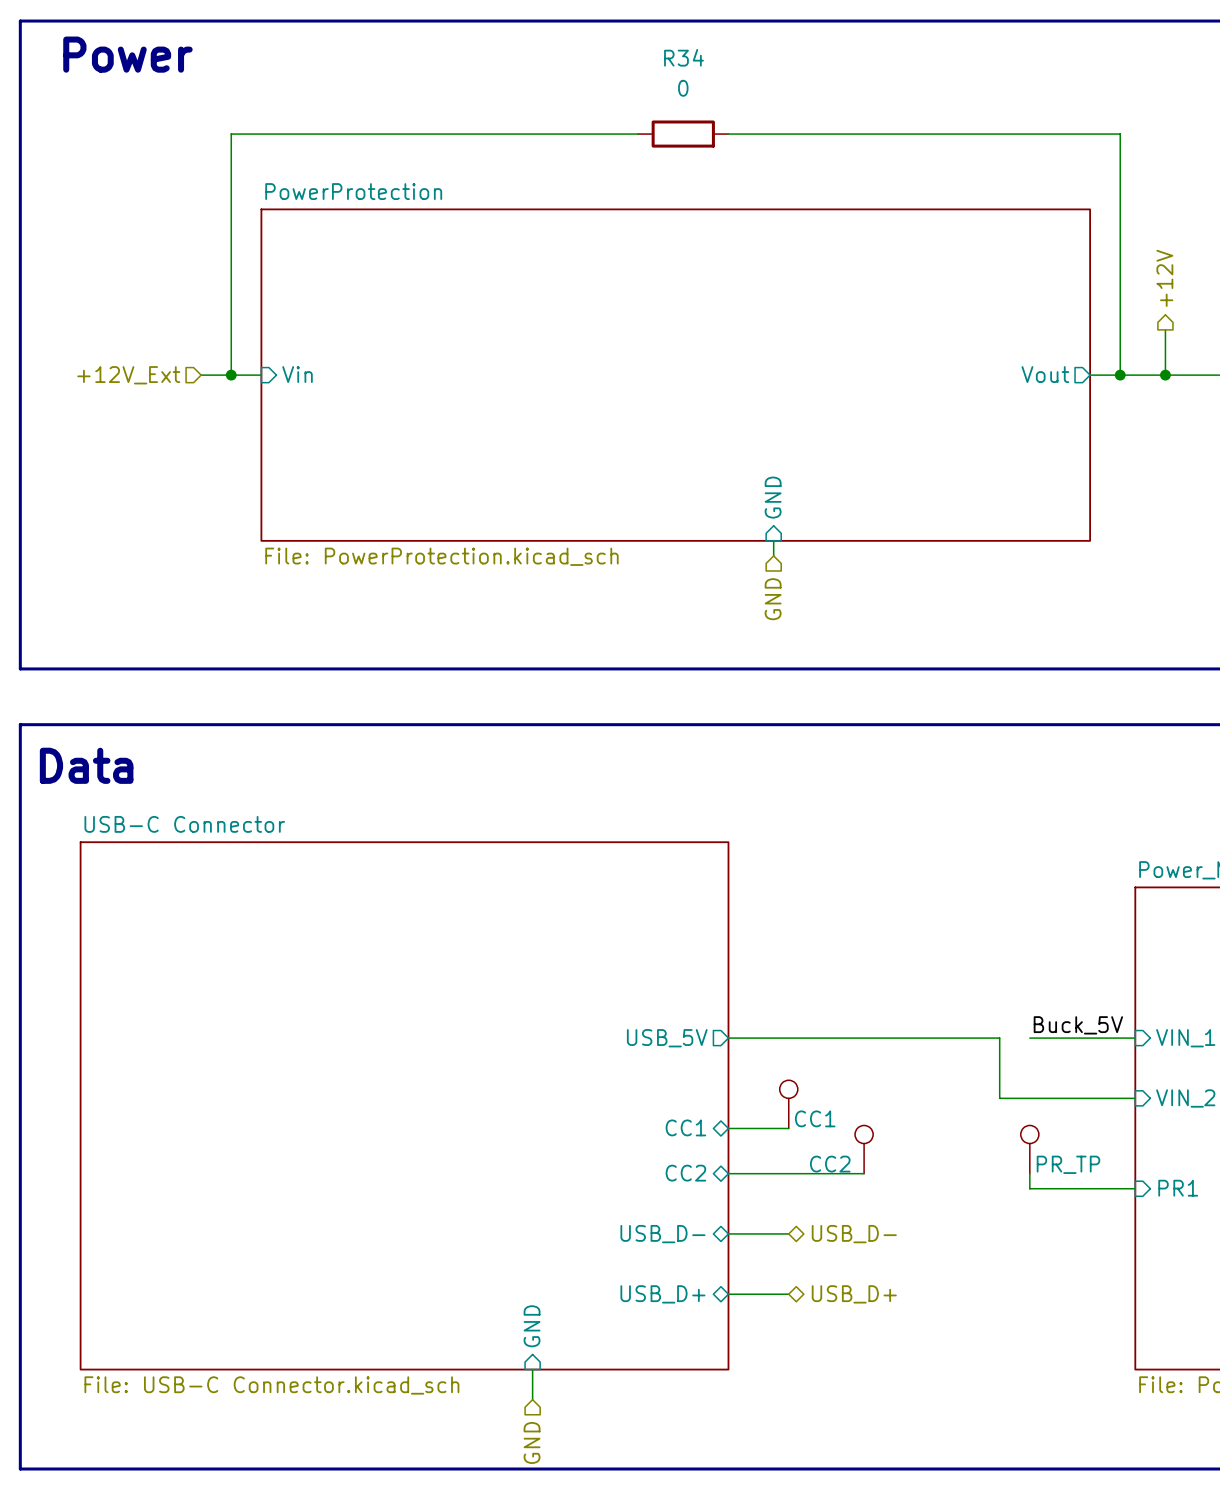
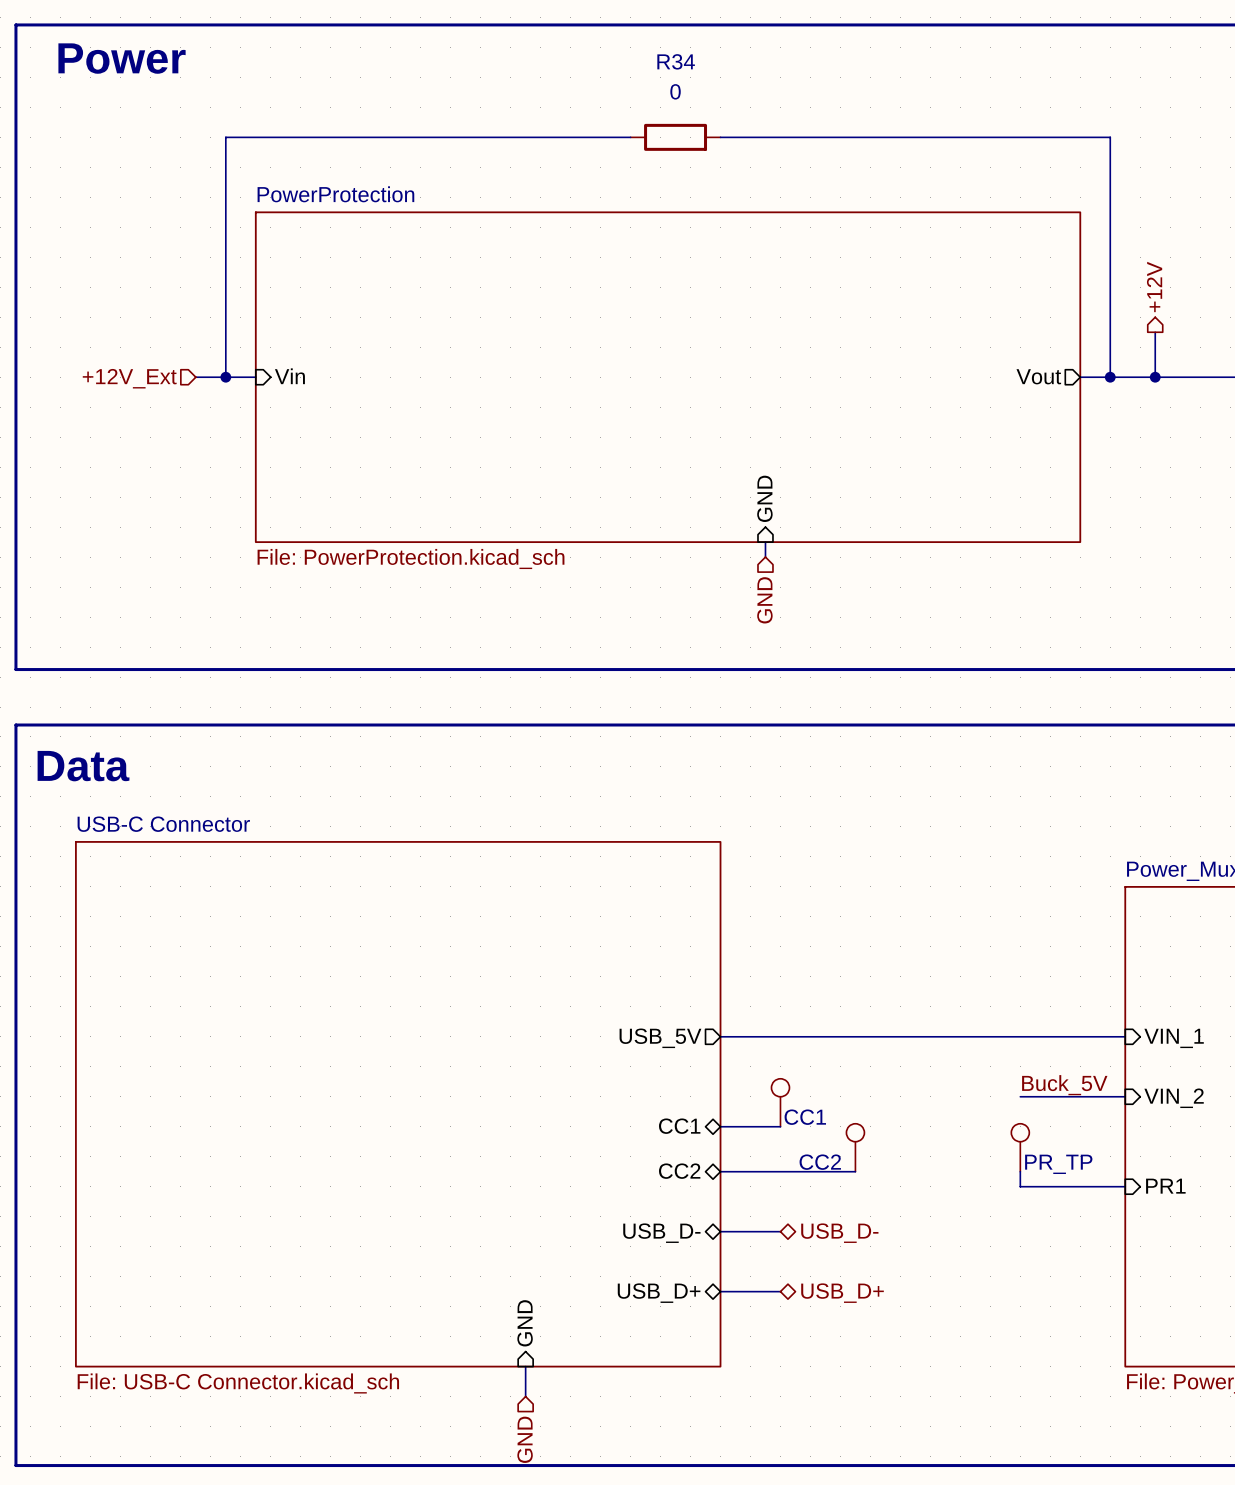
label position: Buck_5V (1078, 1025) -> Buck_5V (1064, 1085)
wire: (999, 1038) (999, 1098) (1029, 1098) -> (990, 1036) (1020, 1036)

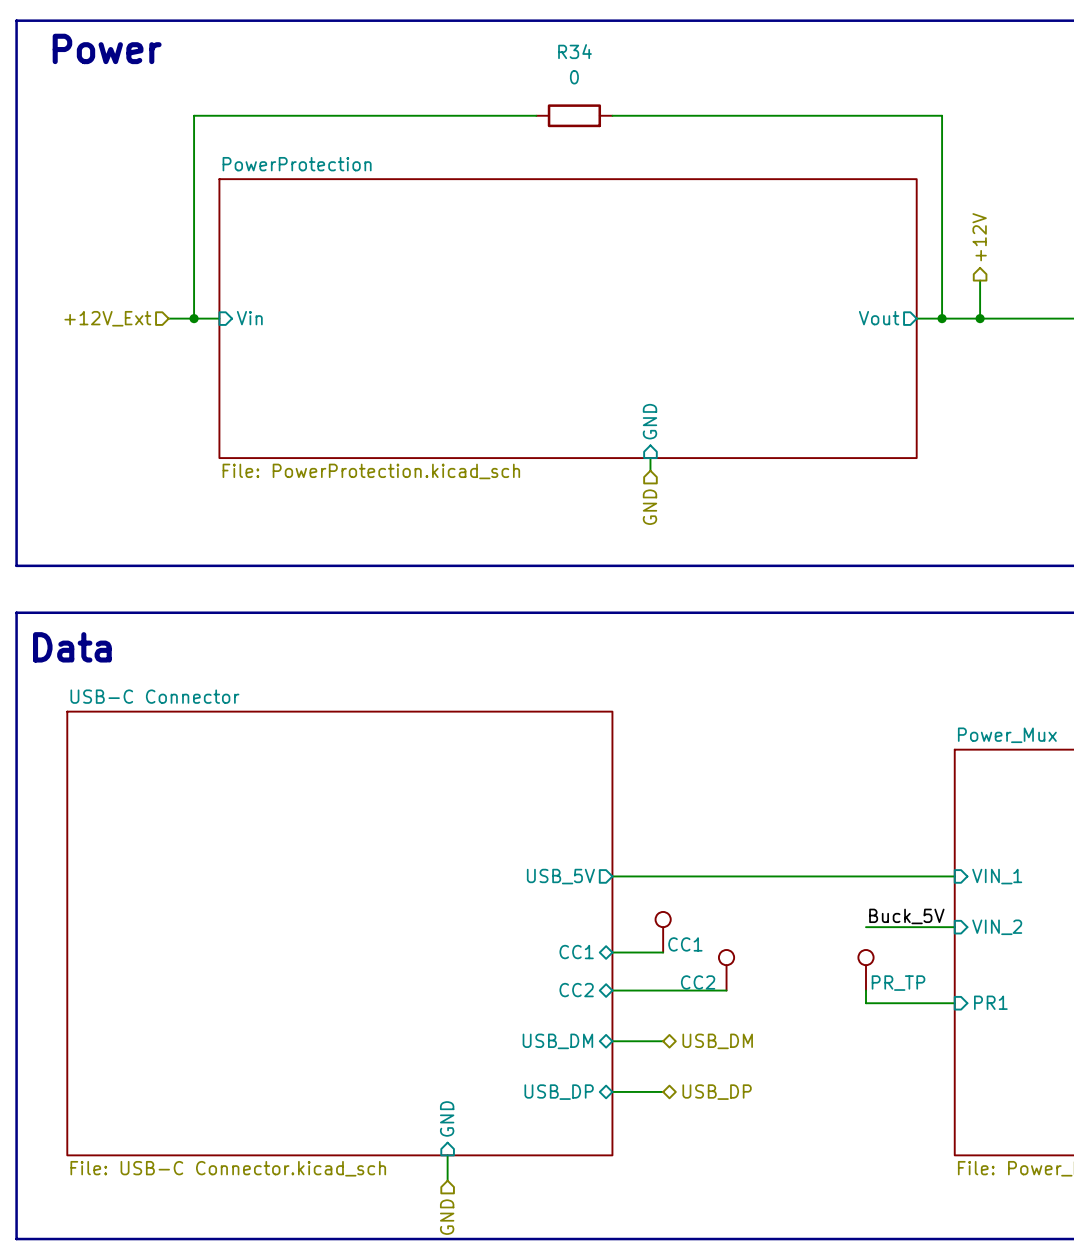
sheet pin: USB_D- (661, 1233) -> USB_DM (557, 1041)
hierarchical label: USB_D- (839, 1233) -> USB_DM (717, 1041)
sheet pin: USB_D+ (659, 1293) -> USB_DP (559, 1092)
hierarchical label: USB_D+ (842, 1293) -> USB_DP (717, 1092)

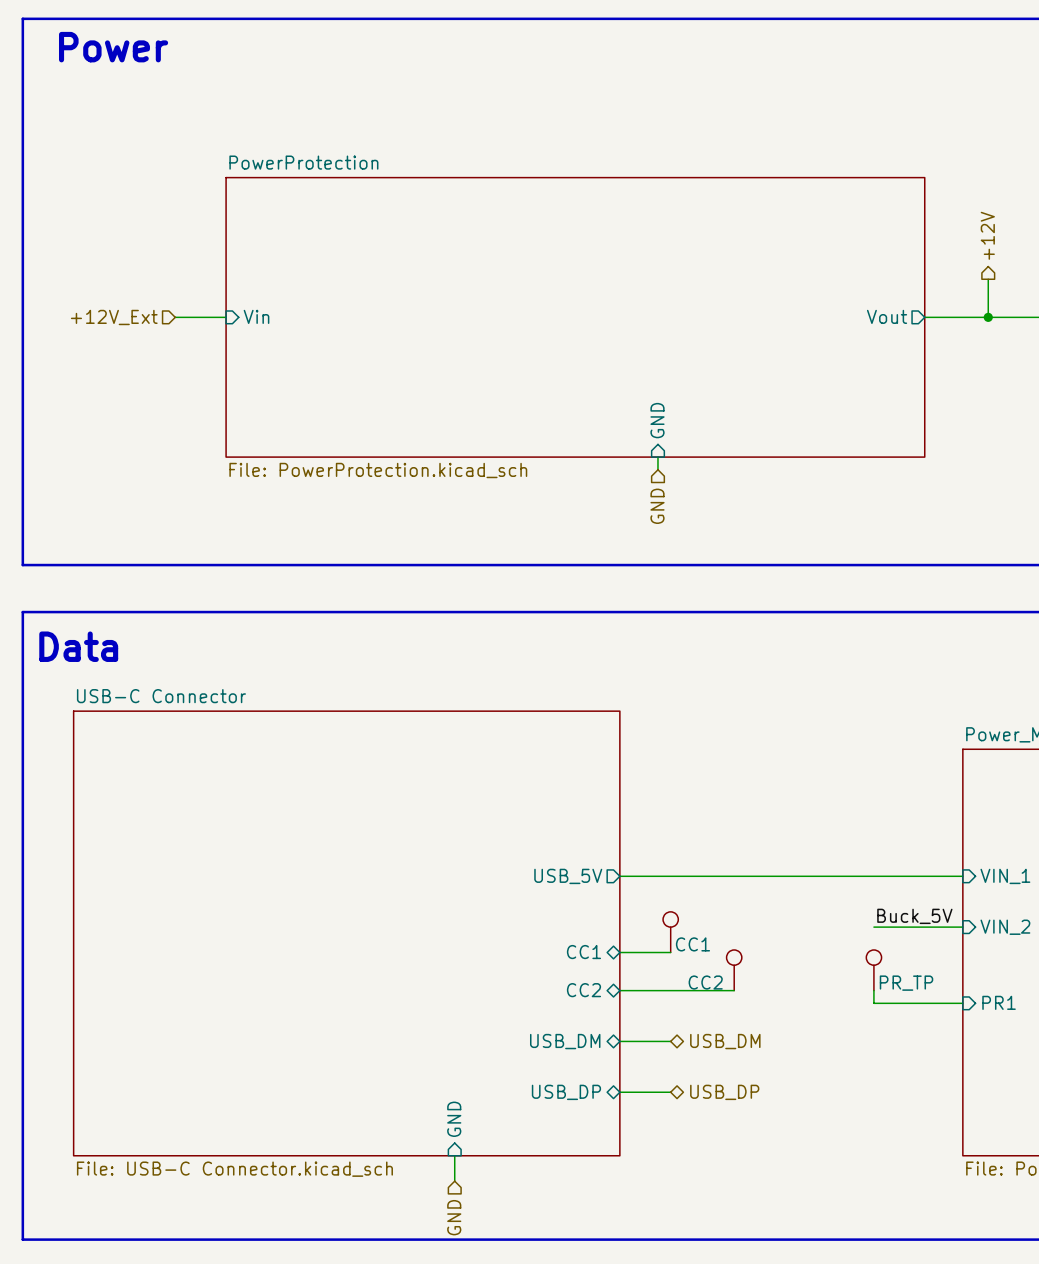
wire: (536, 115) (194, 115) (194, 318) -> none
R34: 0 (574, 115) -> none
wire: (612, 115) (942, 115) (942, 318) -> none
junction: (194, 318) -> none
junction: (942, 318) -> none

